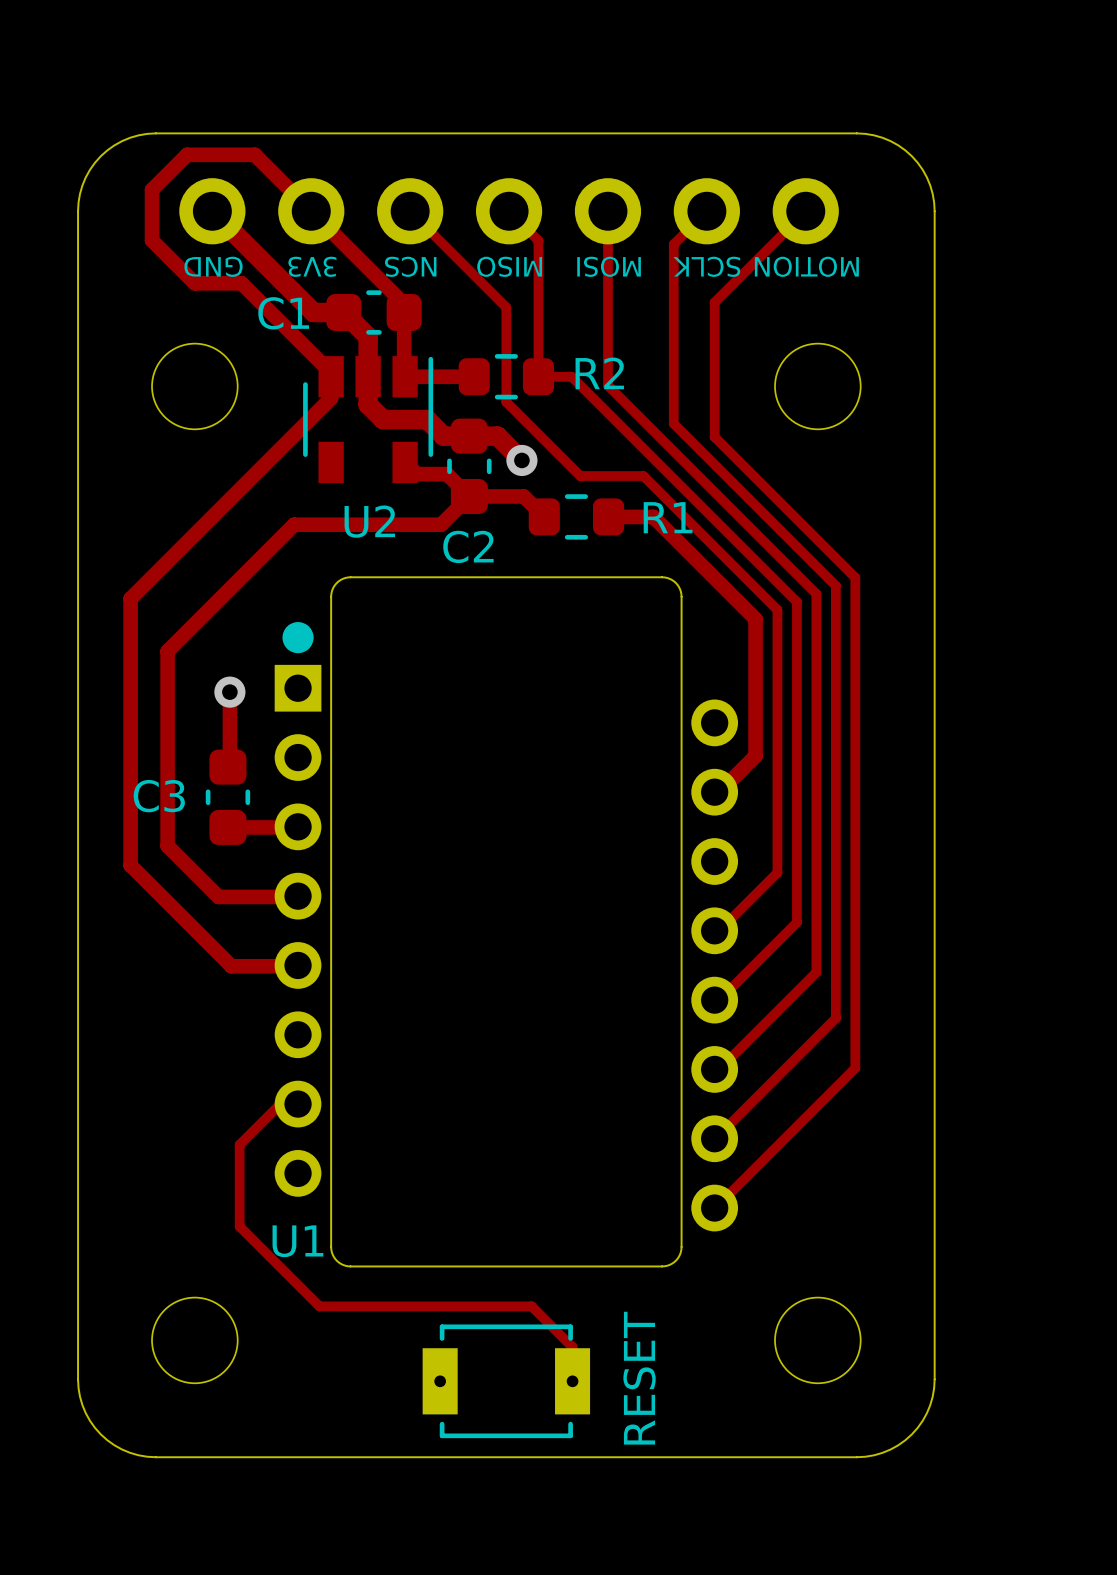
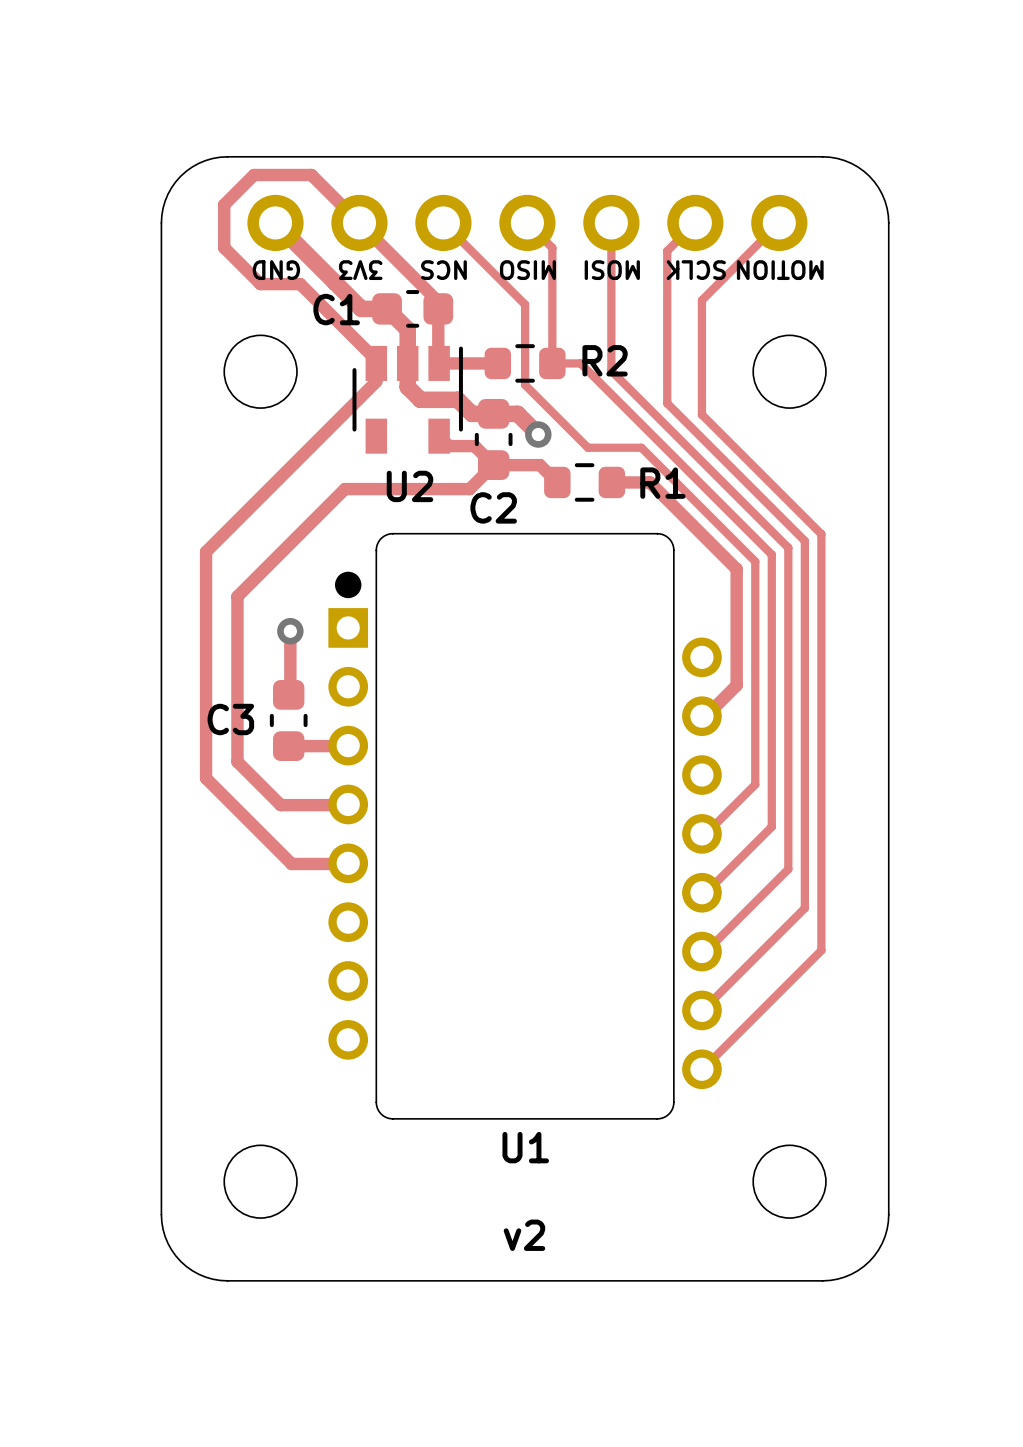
track: (298, 1104) (280, 1104) (239, 1144) (239, 1226) (319, 1306) (531, 1306) (572, 1347) (572, 1381) -> none
U1 name position: U1 (297, 1241) -> U1 (525, 1147)
part: (506, 1381) -> none
text: none -> v2 (524, 1235)

